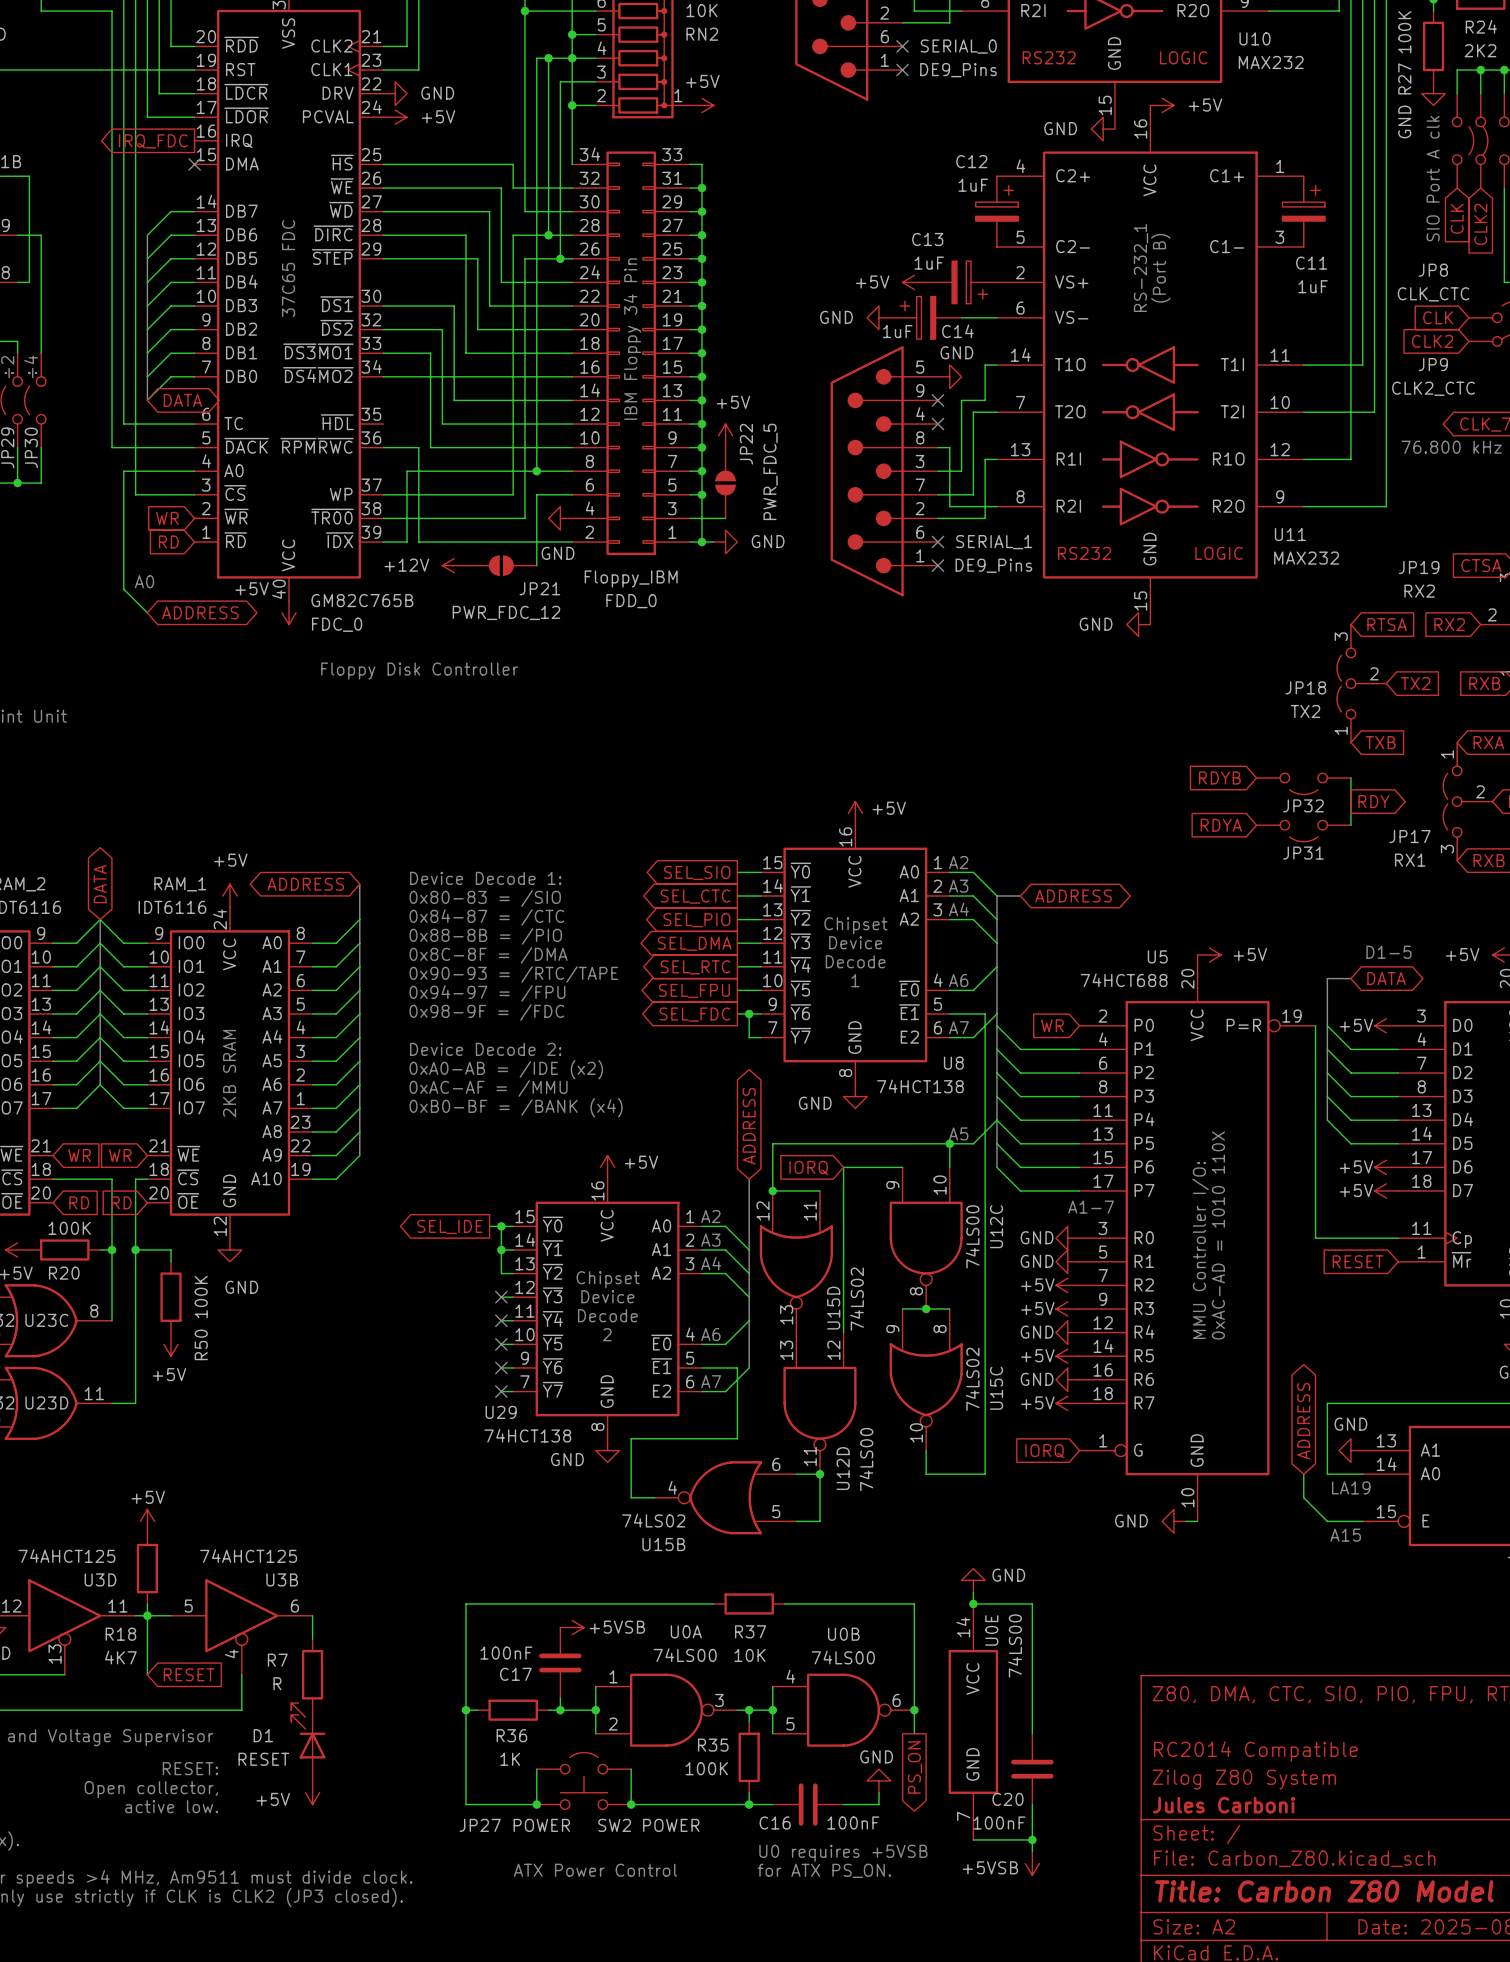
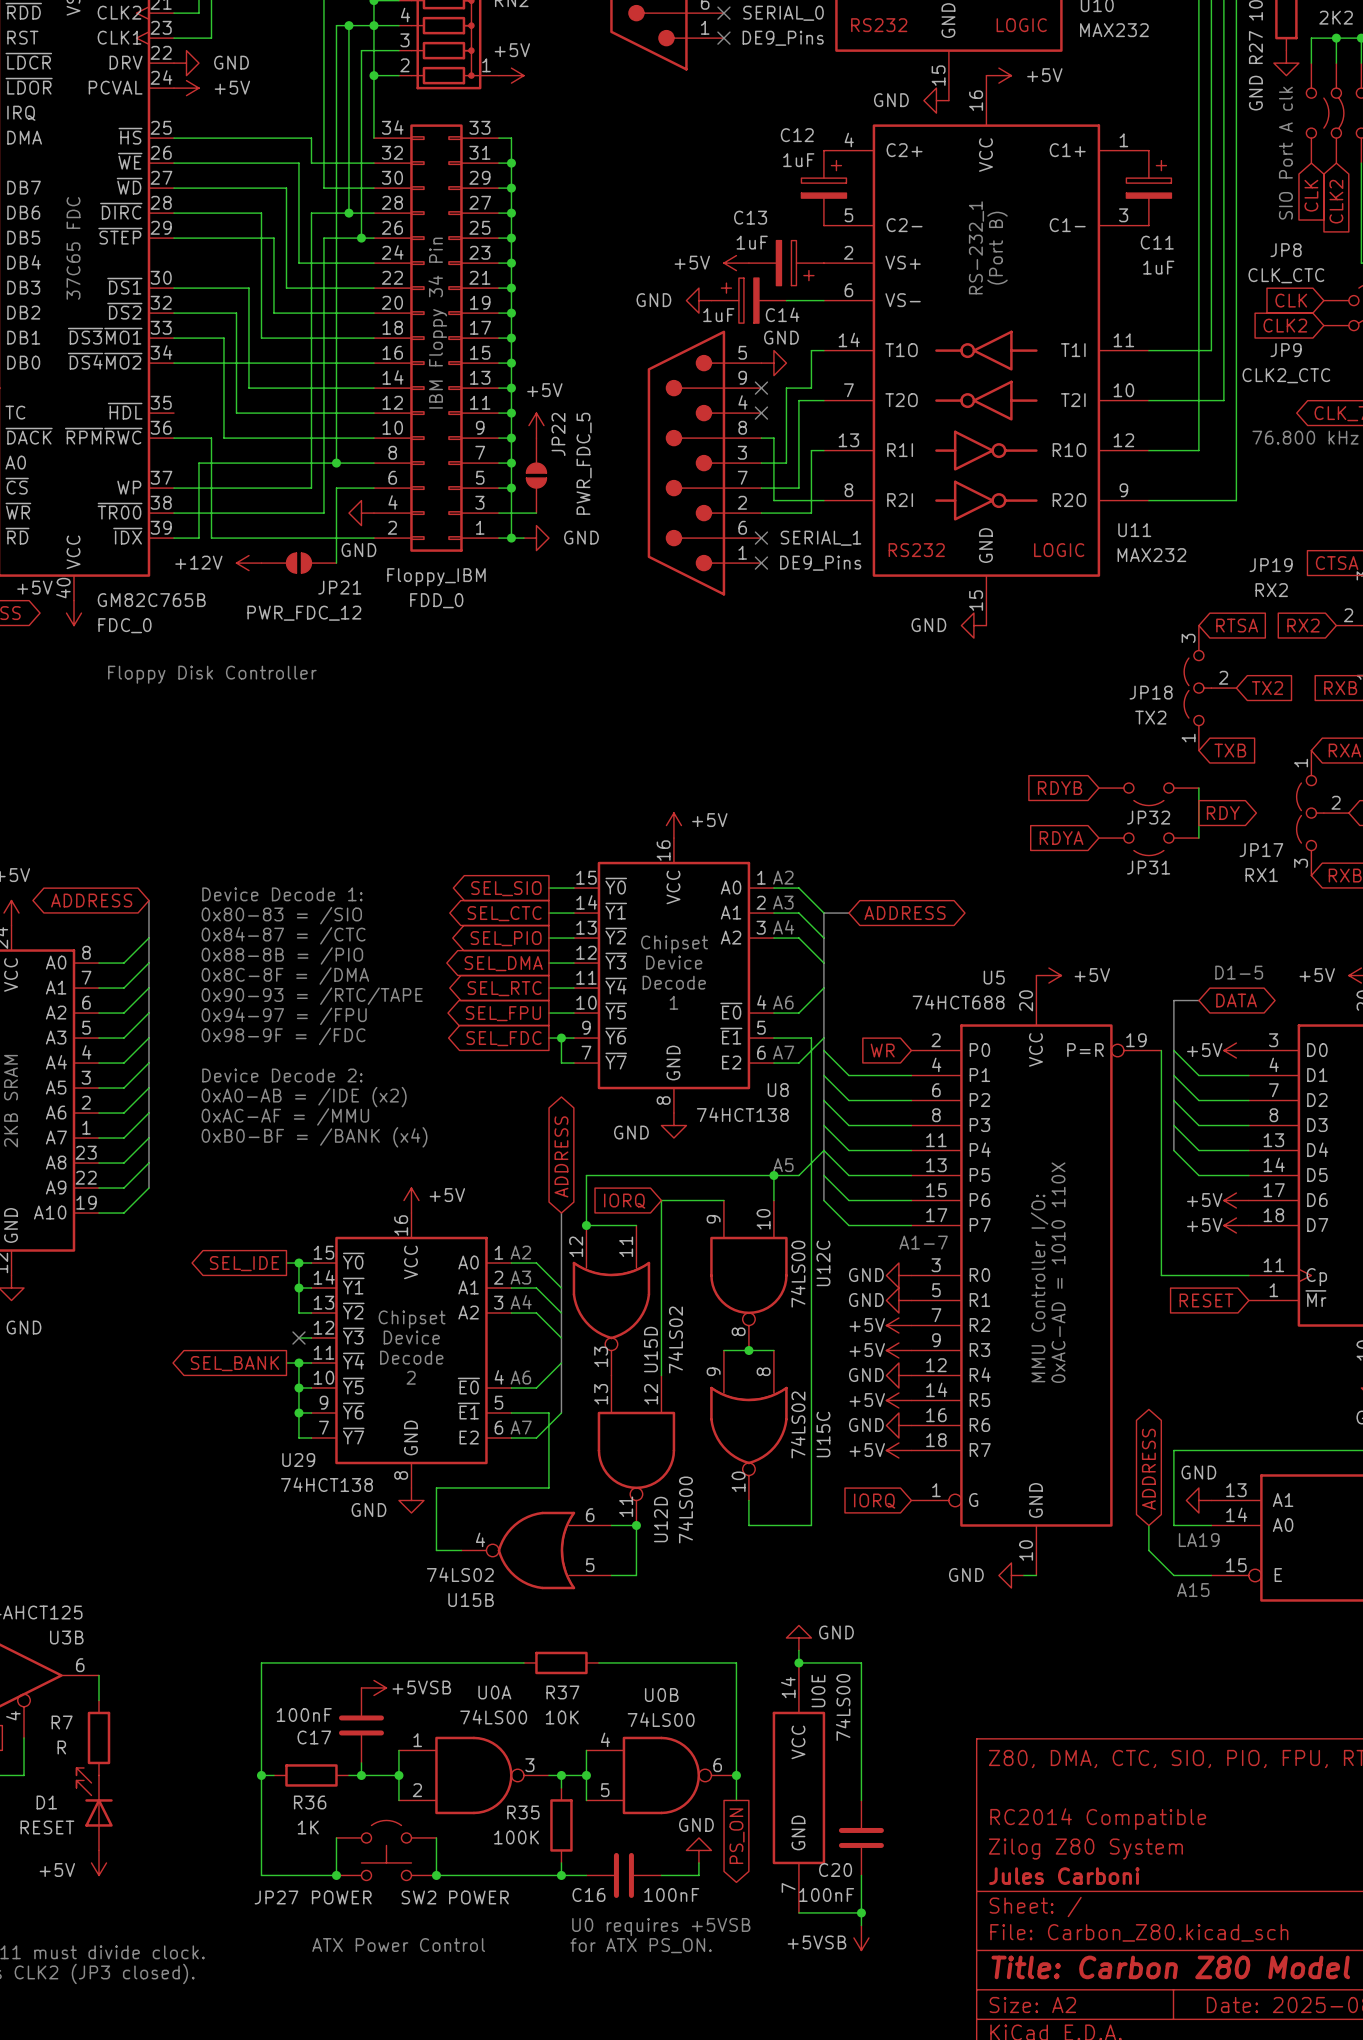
wire: none -> (286, 1363) (298, 1363) (298, 1437)
no-connect mark: (501, 1320) -> none
junction: none -> (298, 1363)
global label: none -> SEL_BANK (234, 1363)
no-connect mark: (501, 1344) -> none
junction: none -> (298, 1388)
no-connect mark: (501, 1367) -> none
junction: none -> (298, 1413)
no-connect mark: (501, 1391) -> none

